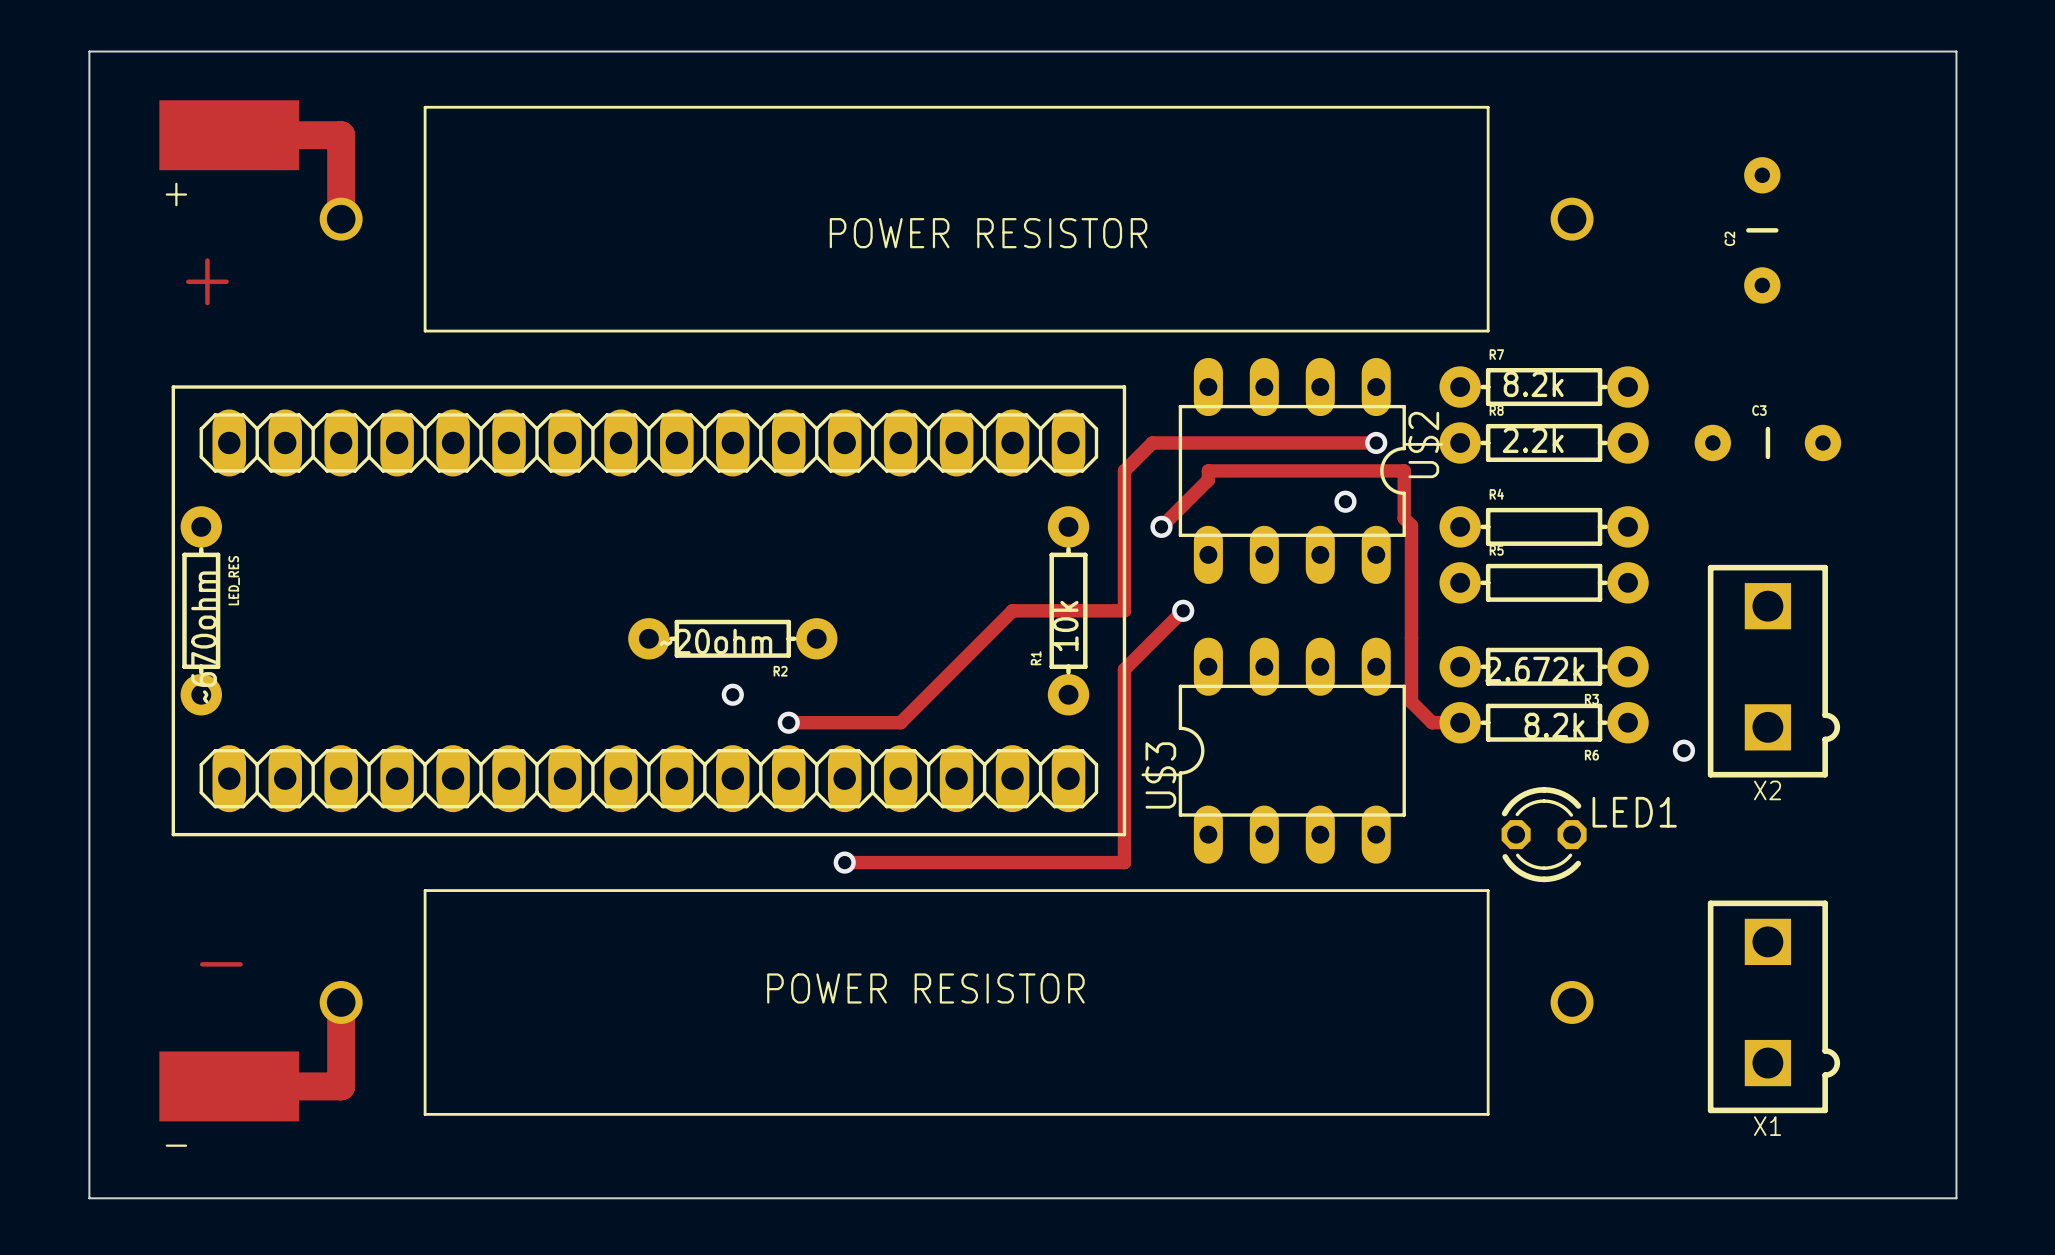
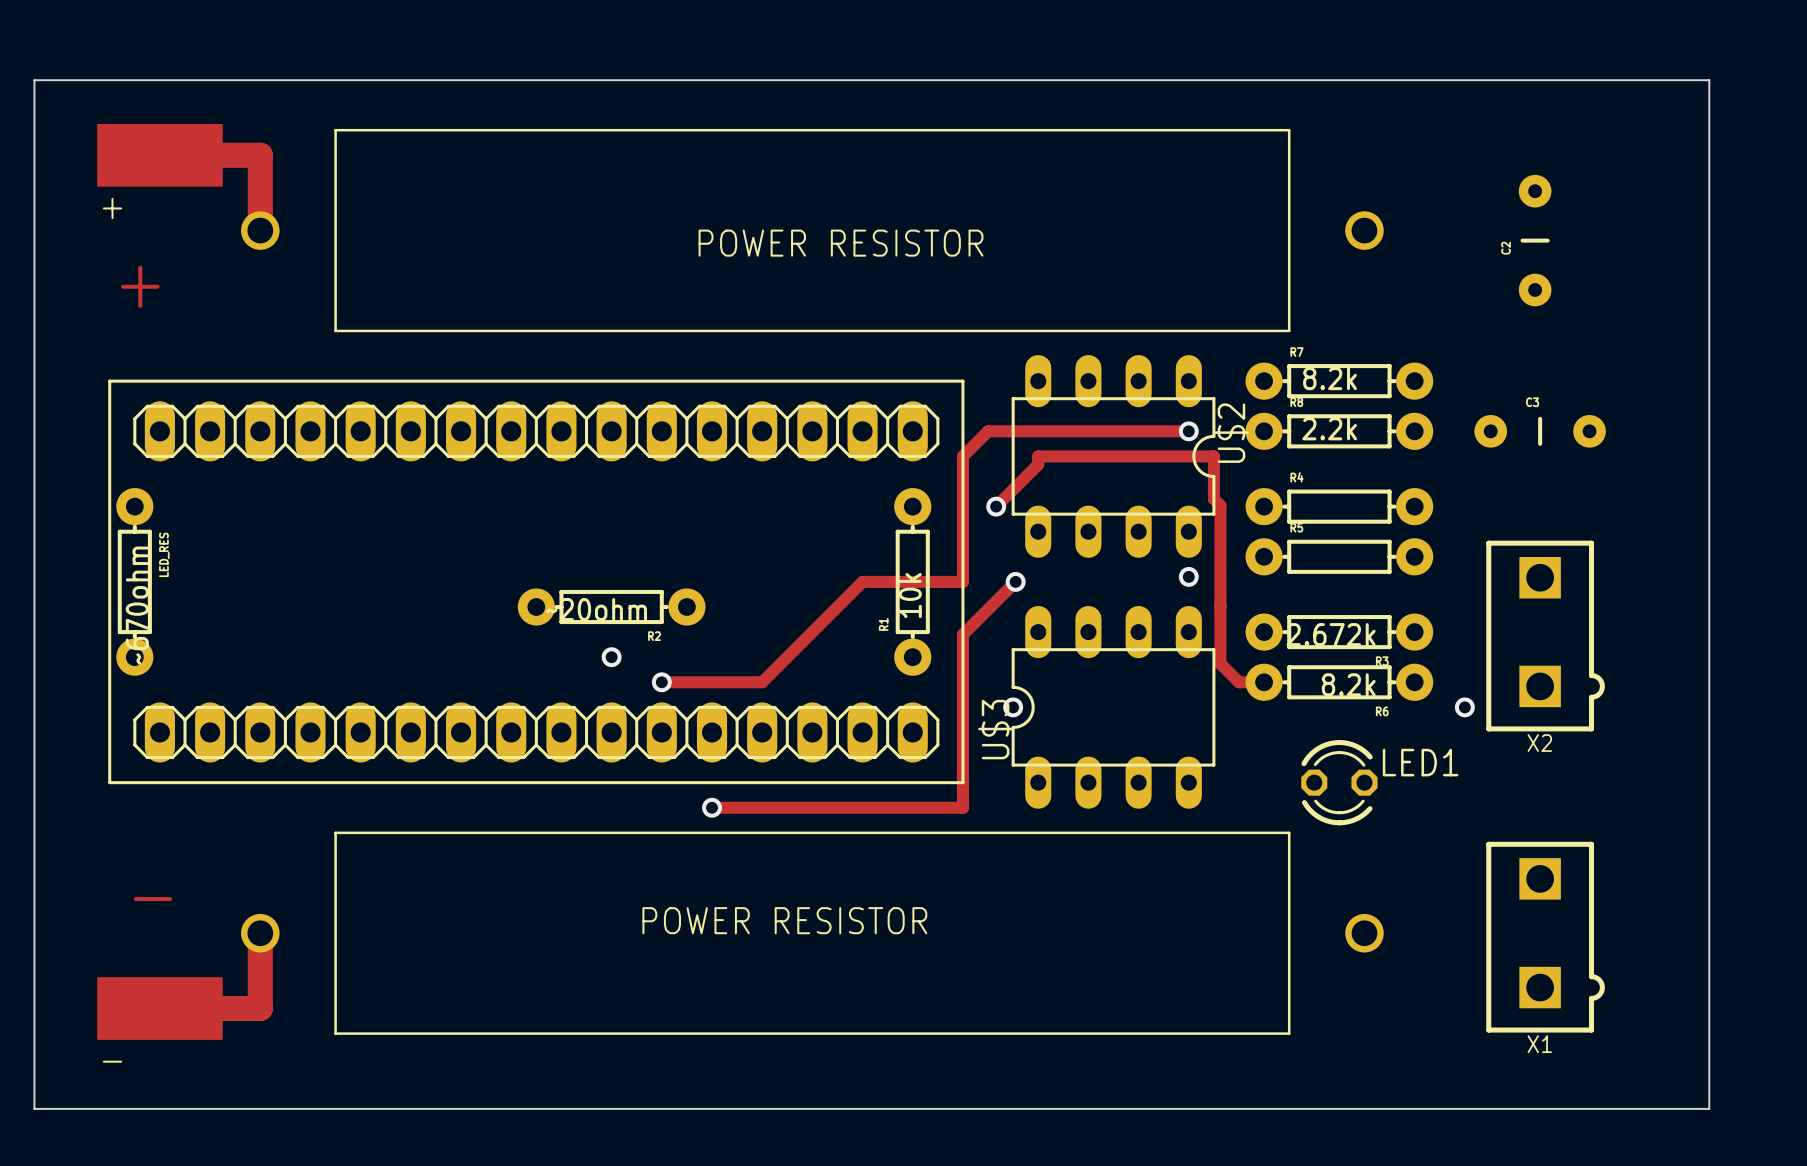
via position: (1345, 501) -> (1188, 576)
via: none -> (1013, 707)

